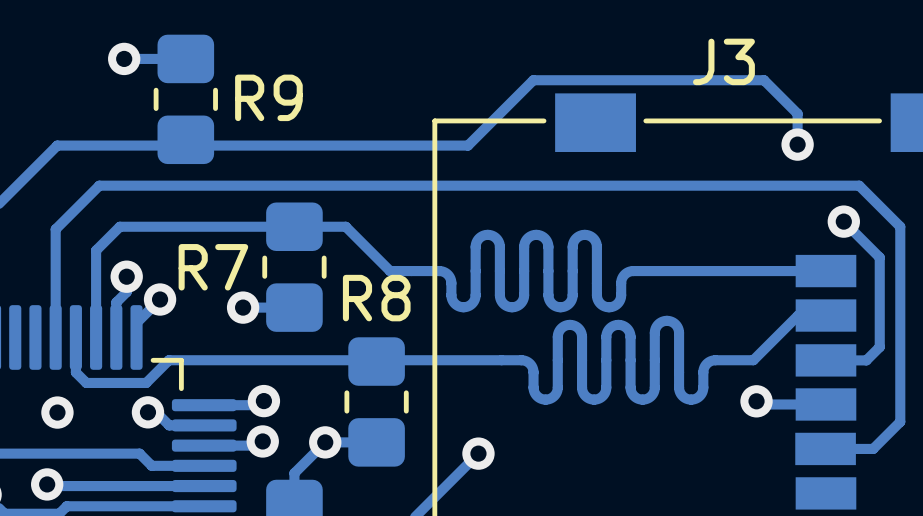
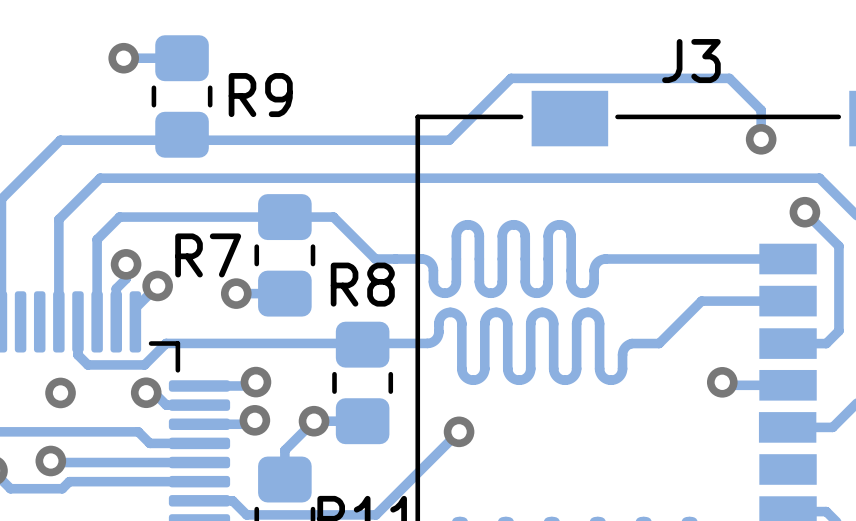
track: (798, 315) (753, 360) (715, 360) (708, 362) (703, 370) (702, 392) (698, 397) (692, 399) (685, 398) (679, 390) (678, 331) (675, 324) (668, 320) (660, 322) (655, 329) (654, 389) (651, 396) (644, 399) (636, 398) (630, 390) (630, 335) (627, 328) (620, 324) (612, 326) (606, 333) (606, 389) (603, 394) (597, 399) (588, 398) (582, 390) (581, 335) (578, 328) (573, 325) (563, 326) (558, 333) (557, 389) (555, 394) (548, 399) (541, 398) (535, 393) (533, 369) (526, 361) (444, 360) -> (761, 301) (701, 301) (659, 343) (631, 343) (626, 346) (622, 353) (621, 373) (618, 377) (612, 380) (605, 378) (599, 371) (599, 322) (596, 315) (589, 312) (582, 313) (577, 320) (576, 370) (573, 376) (566, 380) (559, 378) (554, 371) (553, 322) (550, 315) (545, 312) (537, 313) (531, 319) (530, 370) (527, 376) (522, 379) (513, 378) (508, 371) (507, 322) (505, 316) (500, 313) (491, 313) (485, 319) (484, 370) (482, 375) (477, 379) (468, 379) (462, 371) (461, 322) (457, 314) (450, 312) (442, 315) (439, 320) (437, 337) (433, 341) (427, 343)

